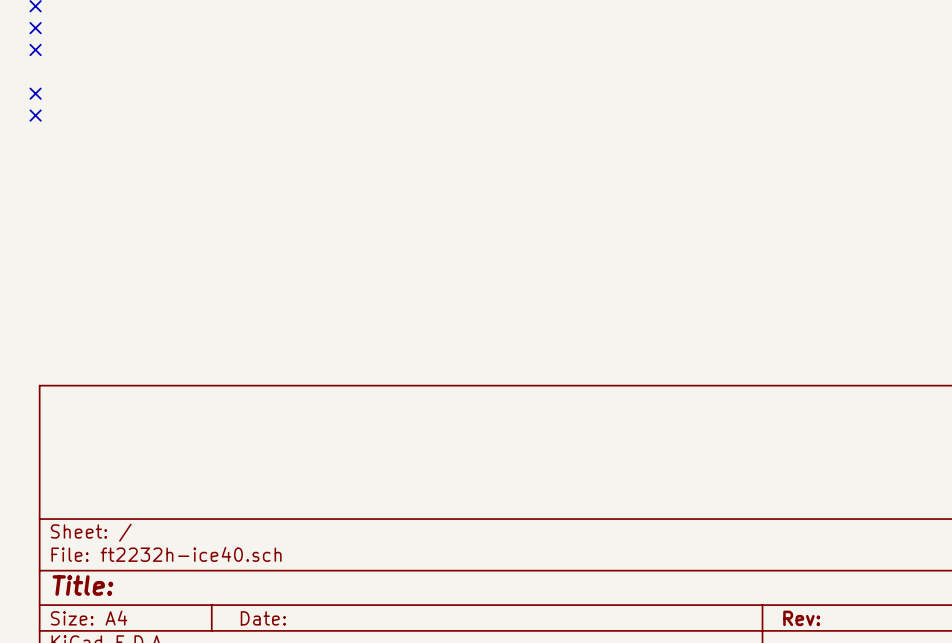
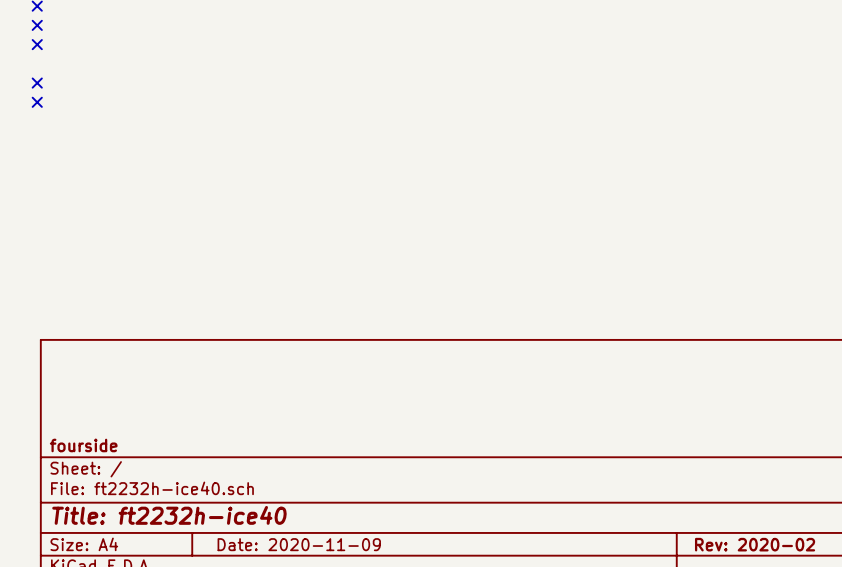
title block: none -> fourside (83, 445)
title block: Title: (82, 585) -> Title: ft2232h-ice40 (169, 515)
title block: Date: (263, 618) -> Date: 2020-11-09 (299, 544)
title block: Rev: (801, 618) -> Rev: 2020-02 (755, 544)

